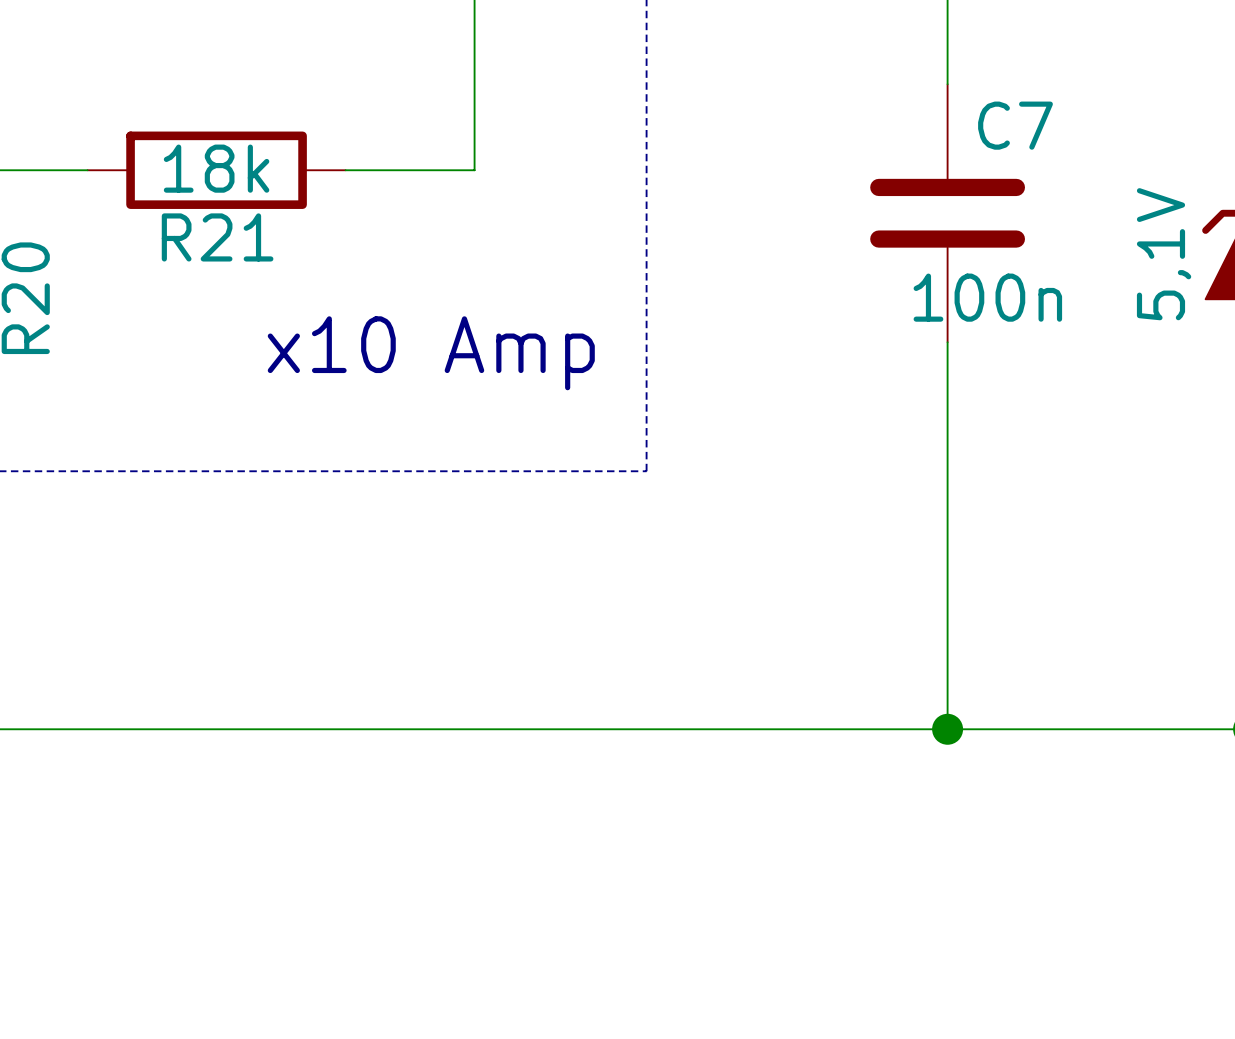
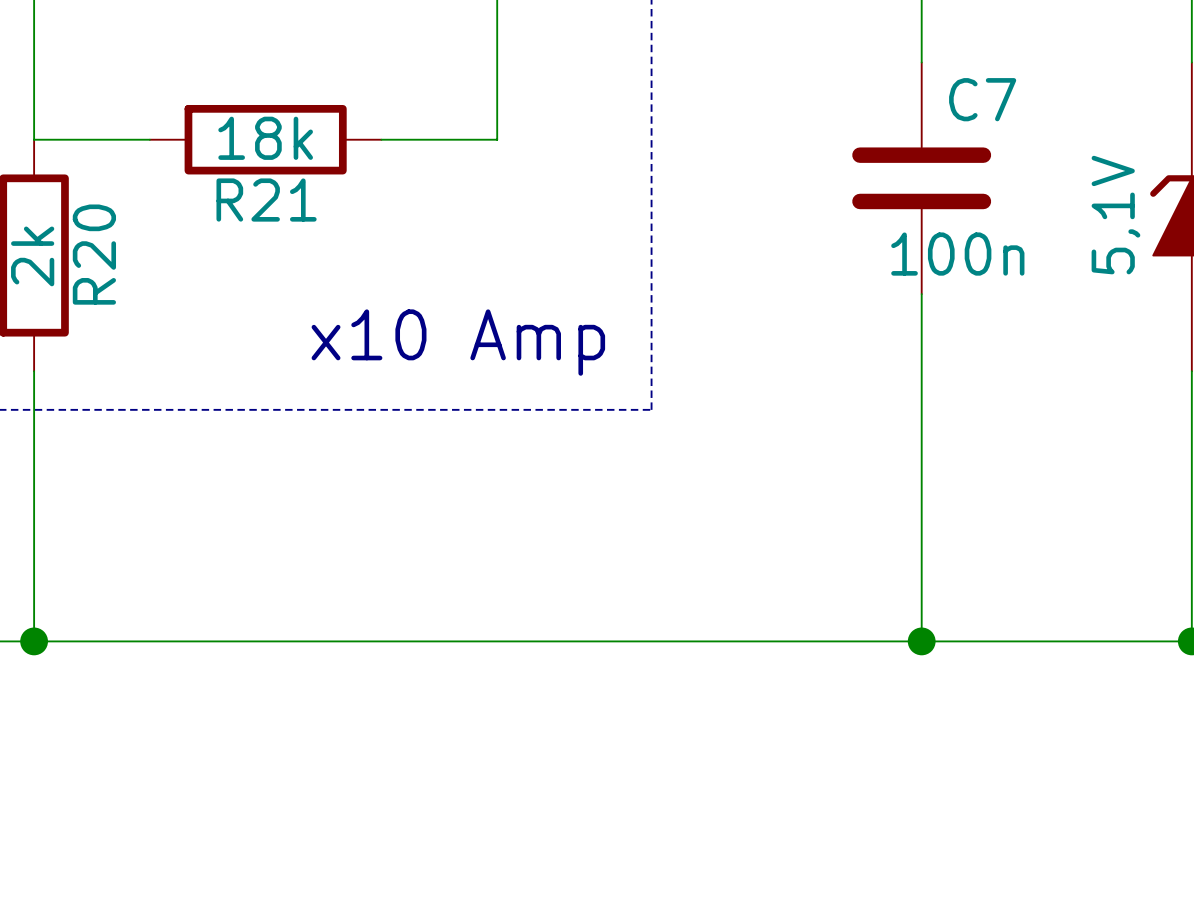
text position: x10 Amp (431, 353) -> x10 Amp (458, 342)

